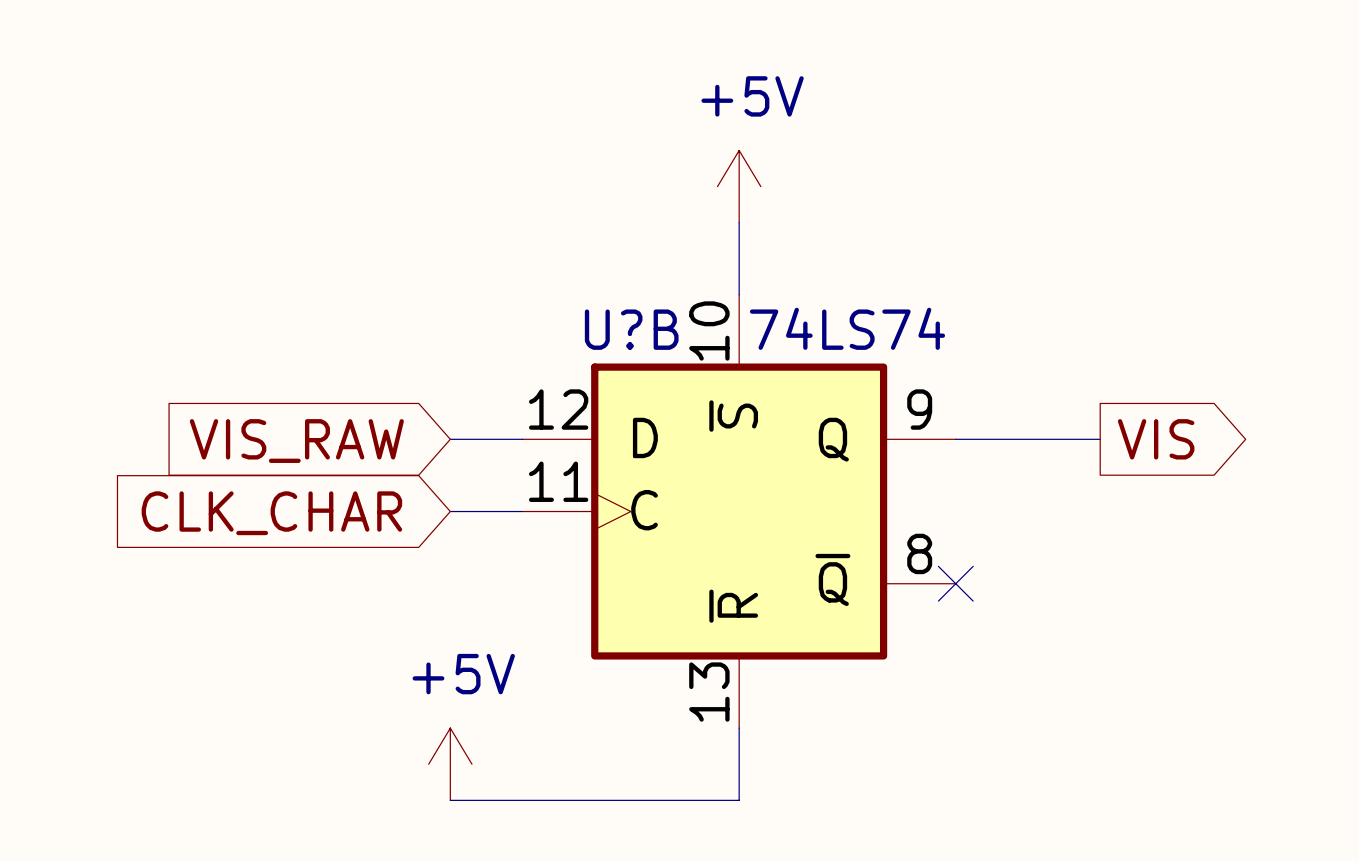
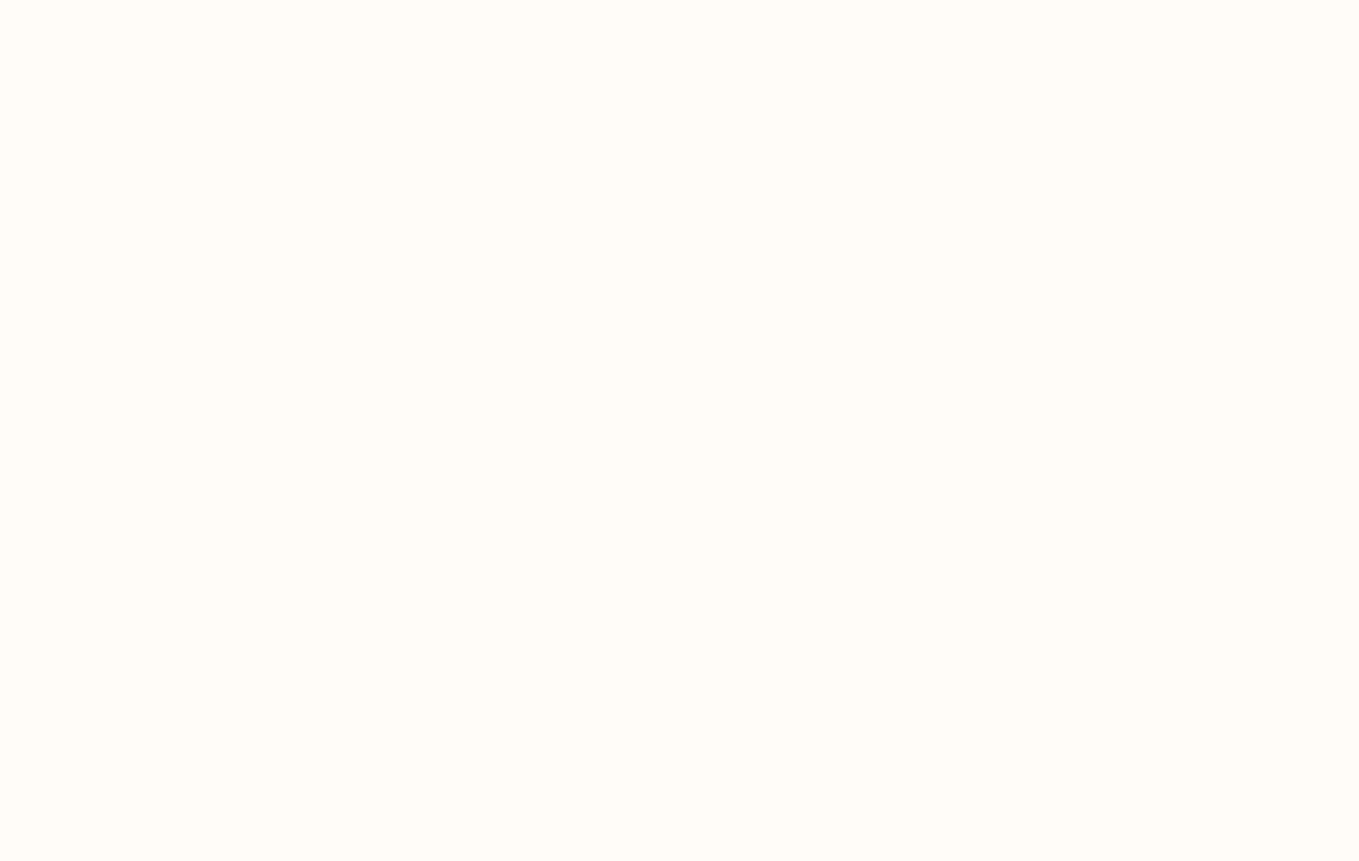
power symbol: +5V (739, 186) -> none
wire: (739, 222) (739, 294) -> none
wire: (450, 439) (522, 439) -> none
wire: (955, 439) (1100, 439) -> none
global label: VIS (1156, 439) -> none
global label: VIS_RAW (296, 441) -> none
wire: (450, 511) (522, 511) -> none
U?B: 74LS74 (739, 511) -> none
global label: CLK_CHAR (271, 513) -> none
no-connect mark: (955, 583) -> none
wire: (739, 728) (739, 800) (450, 800) -> none
power symbol: +5V (450, 764) -> none

